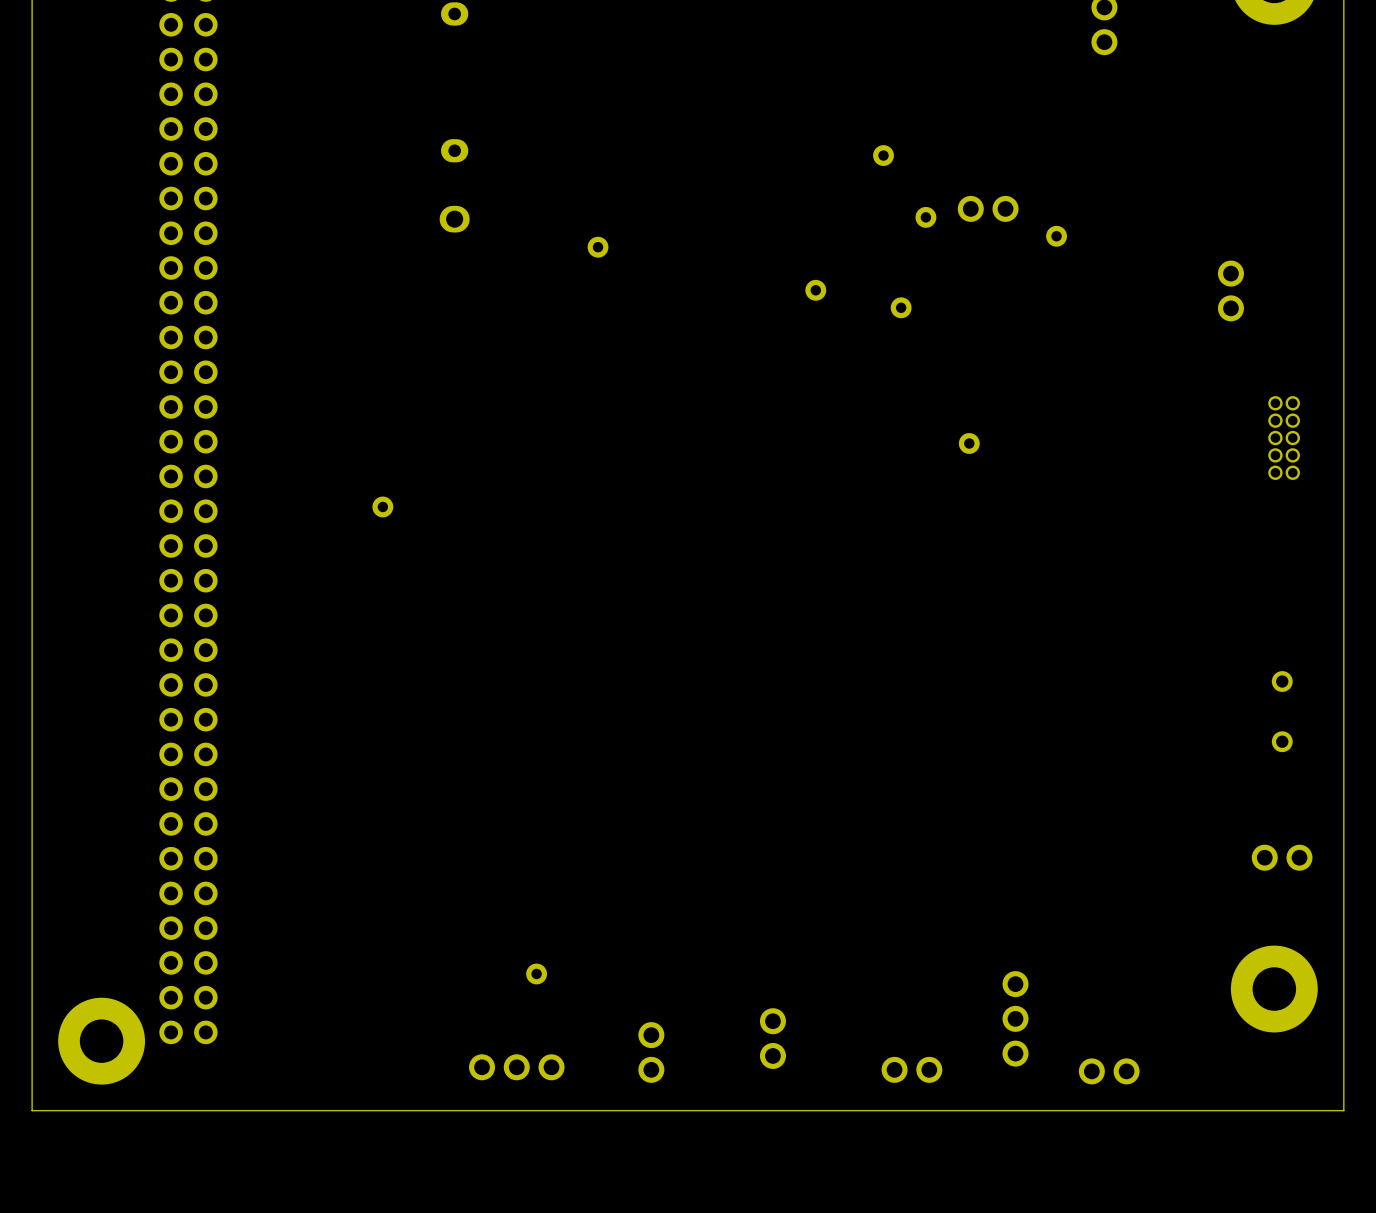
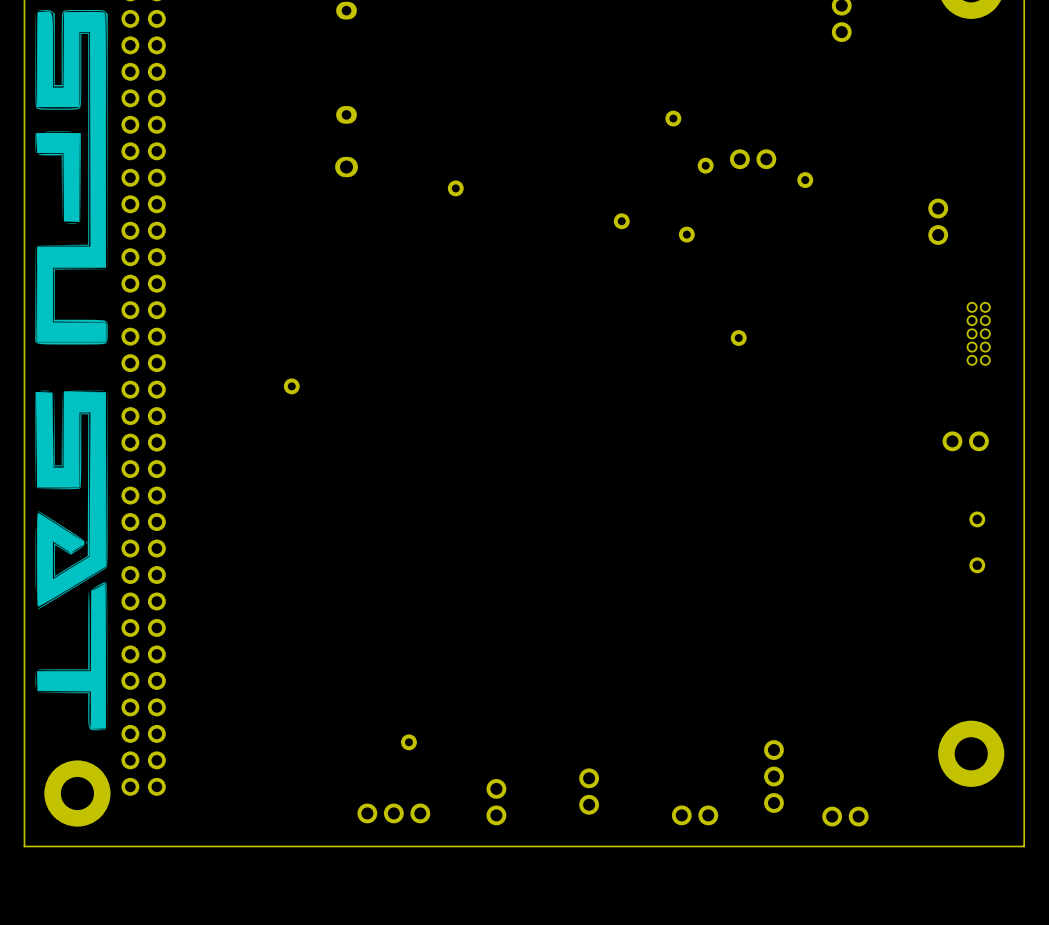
drawing: none -> [35, 9, 108, 731]
part position: (1282, 857) -> (965, 441)

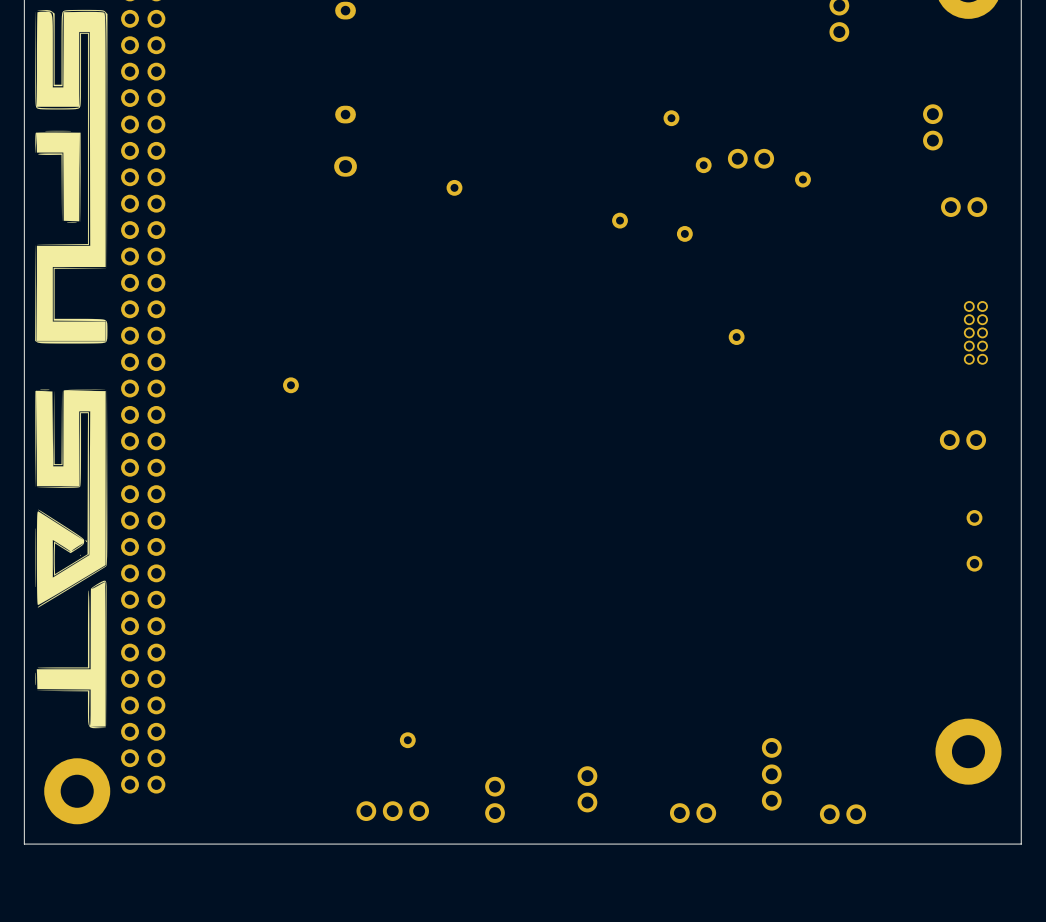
part: none -> (932, 127)
part rotation: 0° (938, 221) -> 90° clockwise (964, 207)
part position: (938, 221) -> (964, 207)

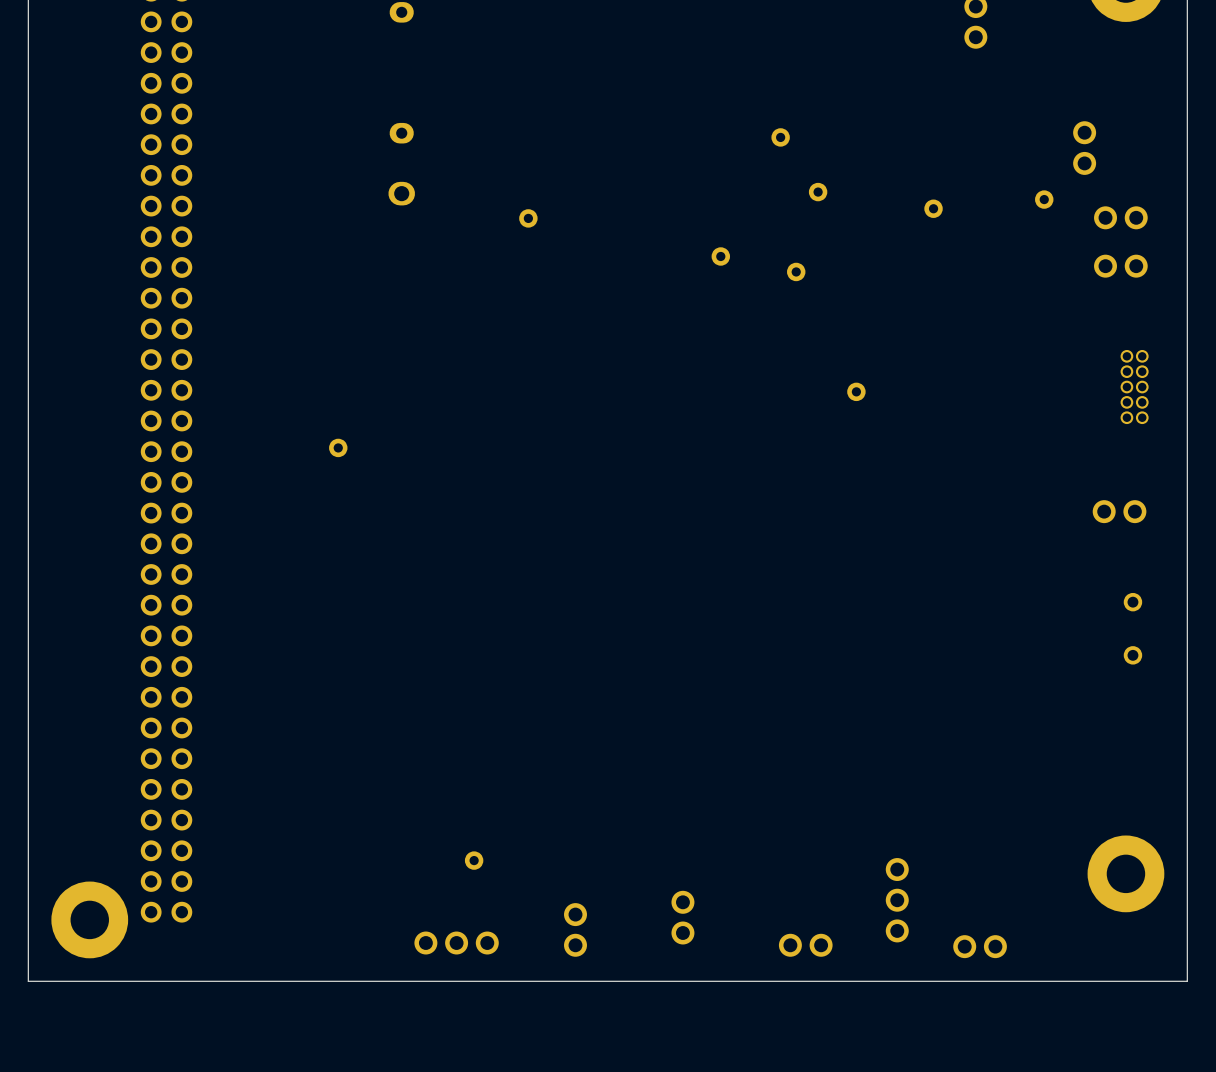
drawing: [35, 9, 108, 729] -> none
part: (750, 158) -> none
part: none -> (1044, 199)
part: none -> (1120, 217)
part: (964, 207) -> none
part: none -> (1120, 266)

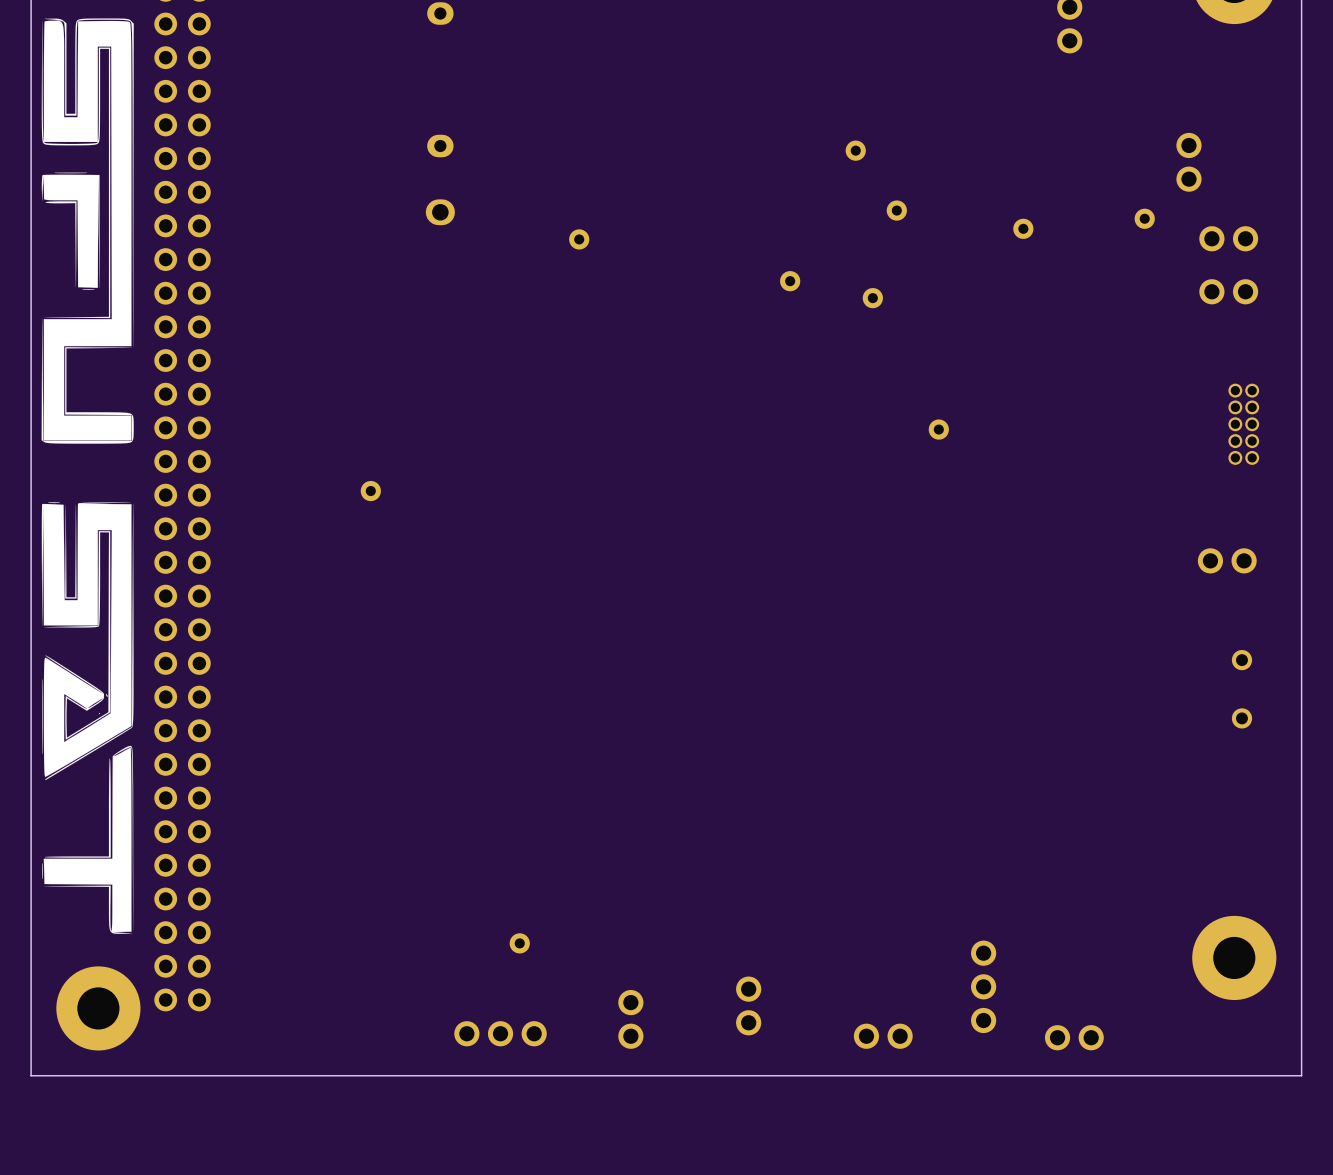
drawing: none -> [41, 18, 134, 934]

